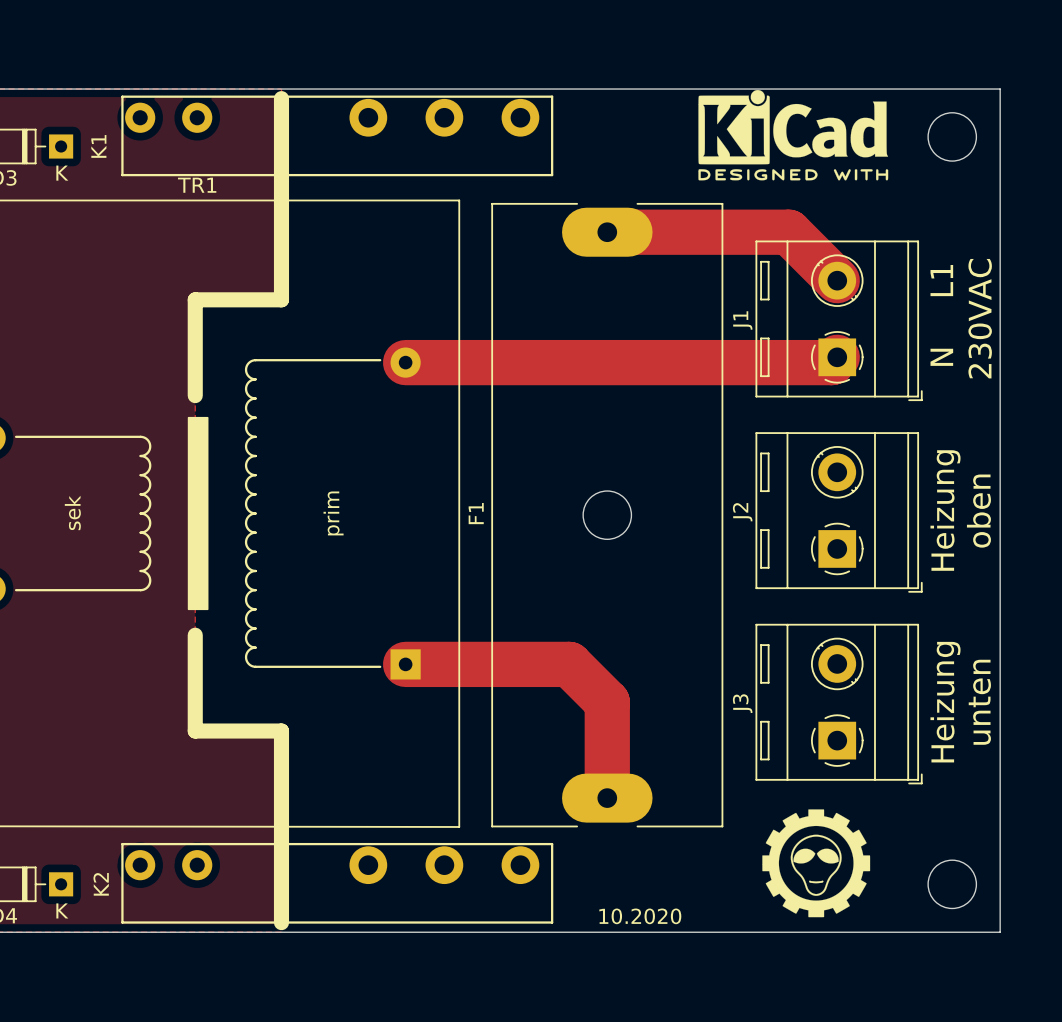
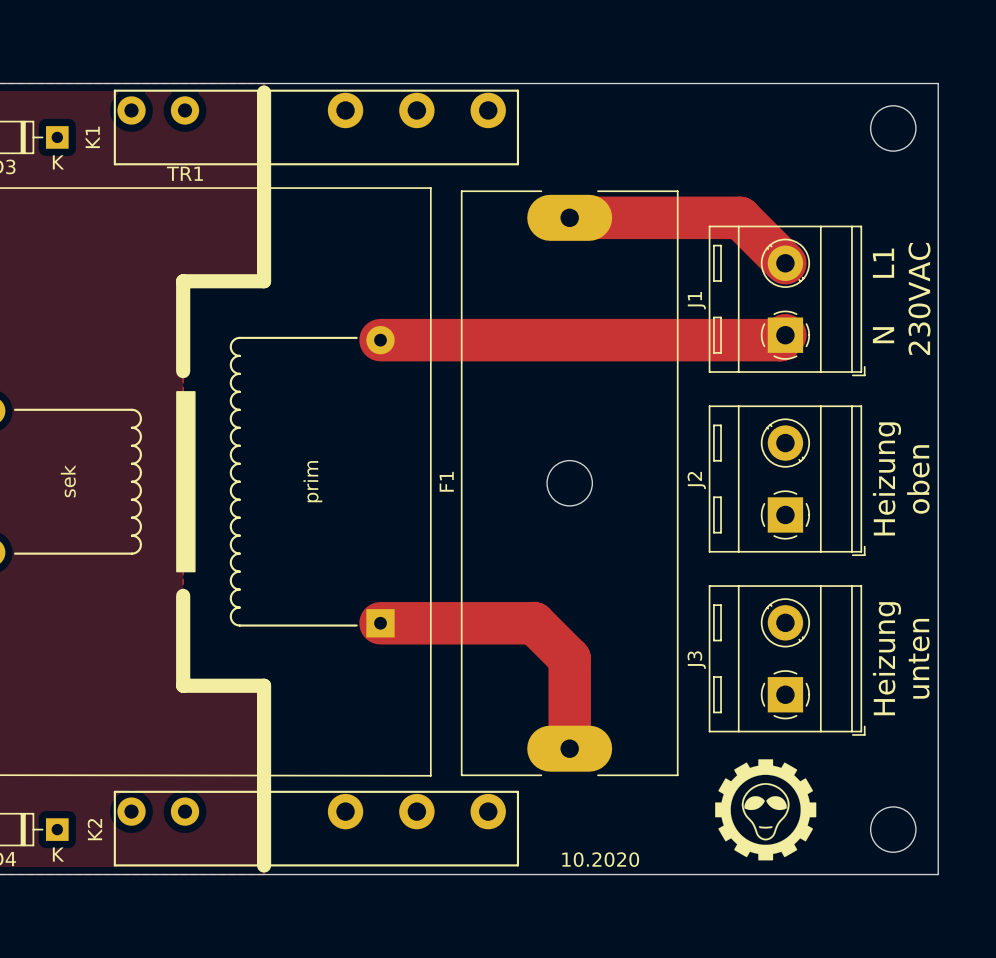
drawing: [698, 90, 889, 181] -> none

